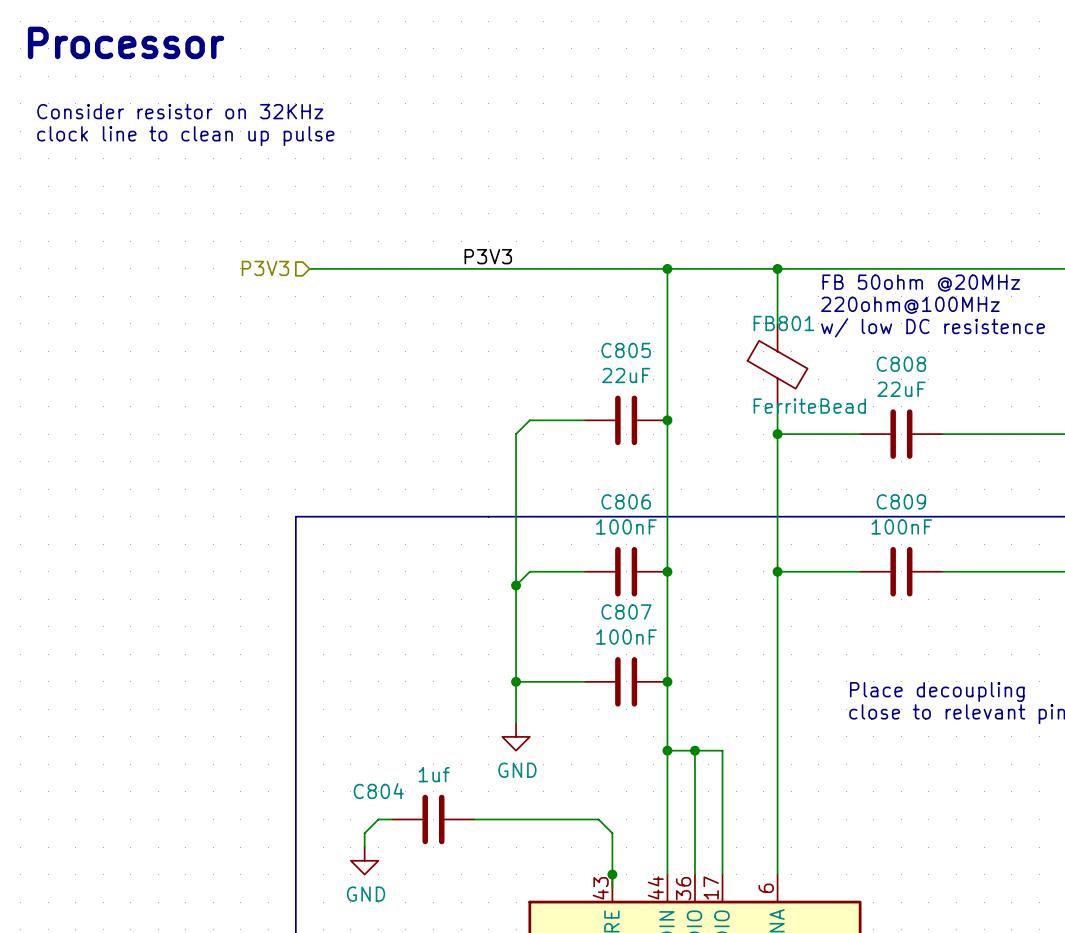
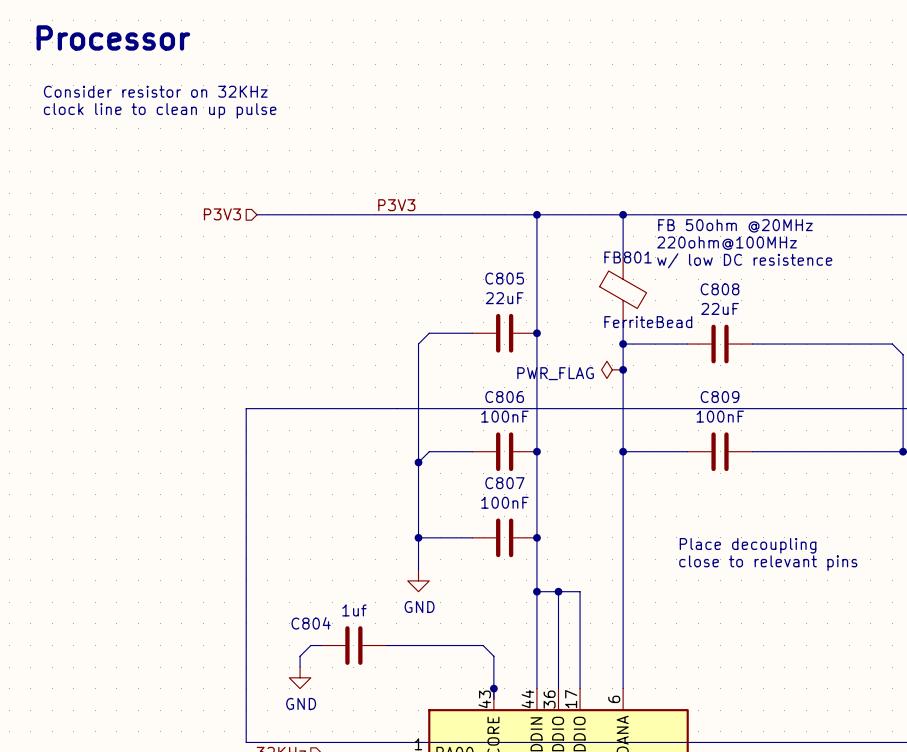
power symbol: none -> PWR_FLAG (612, 369)
junction: none -> (623, 369)

